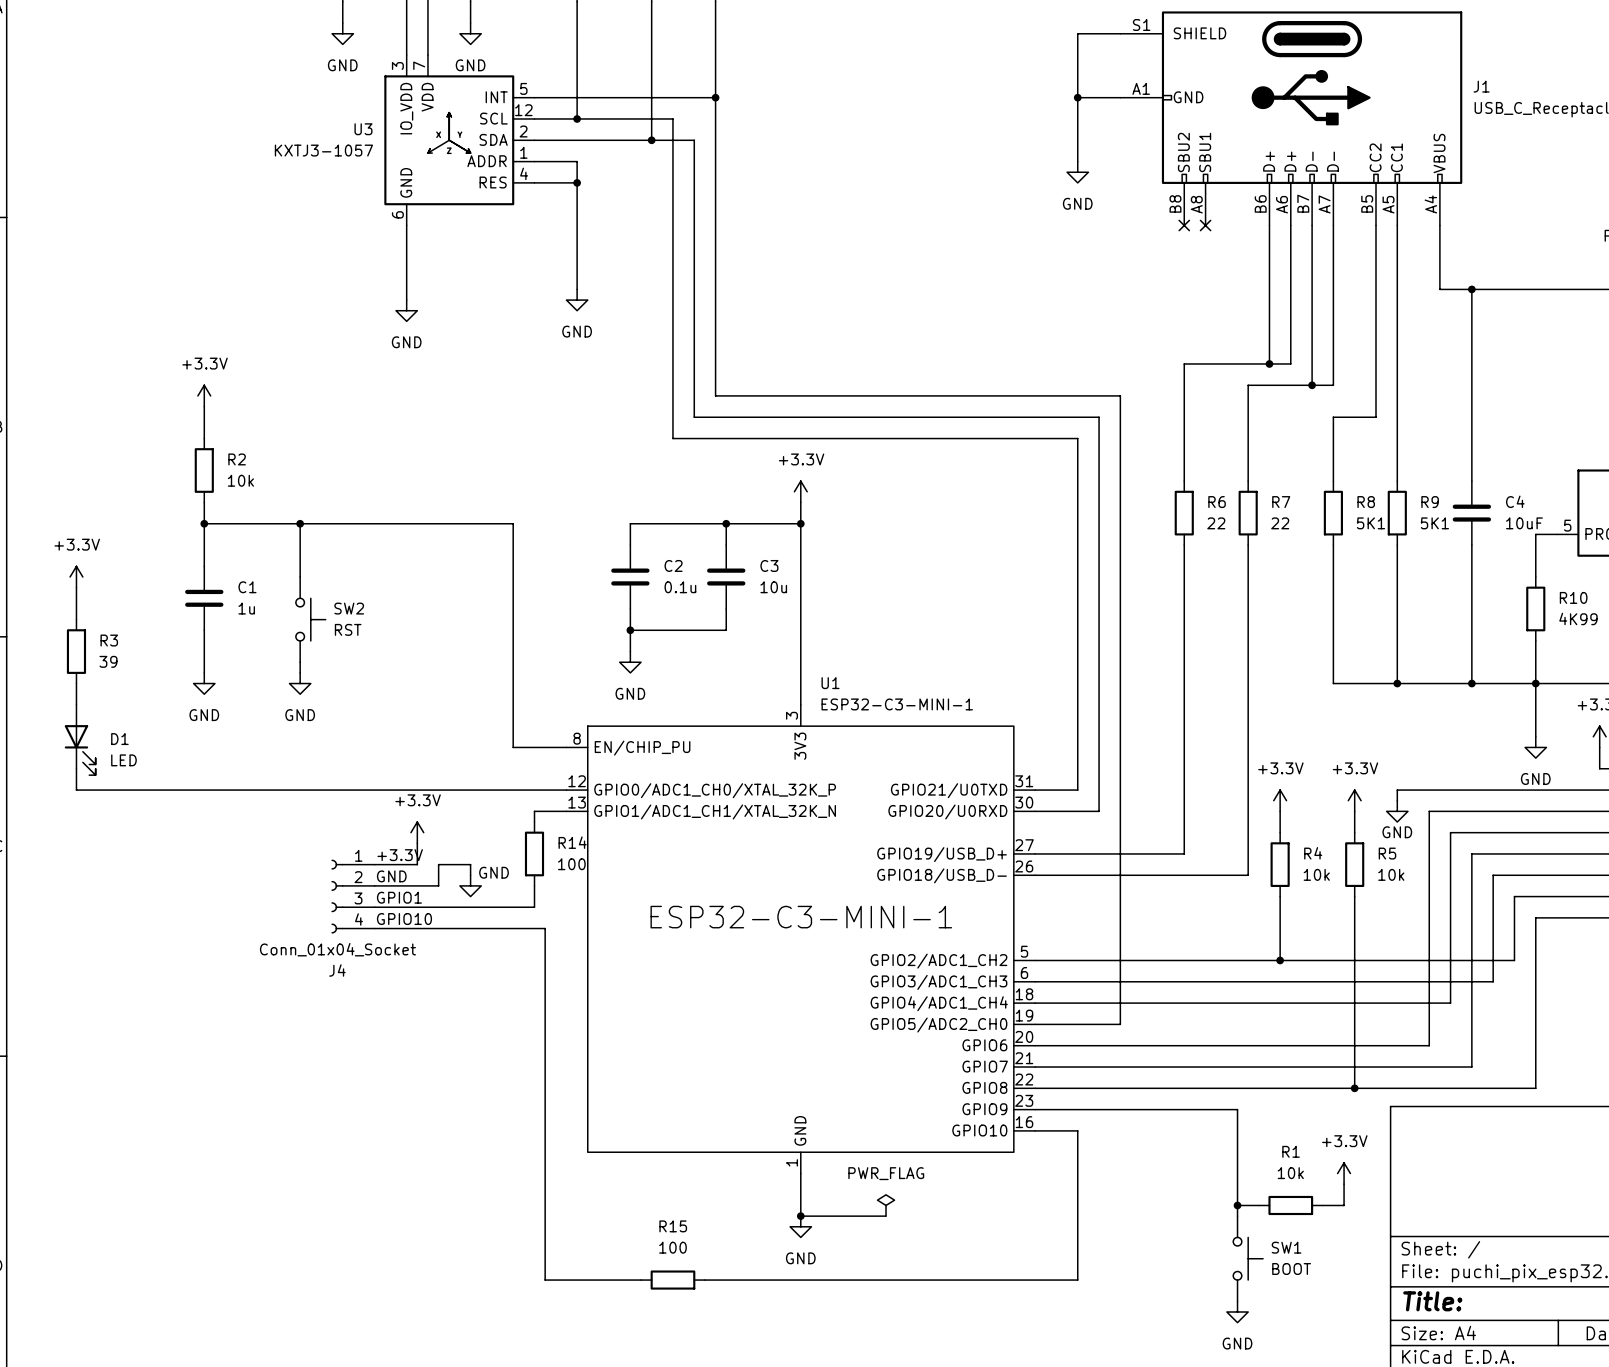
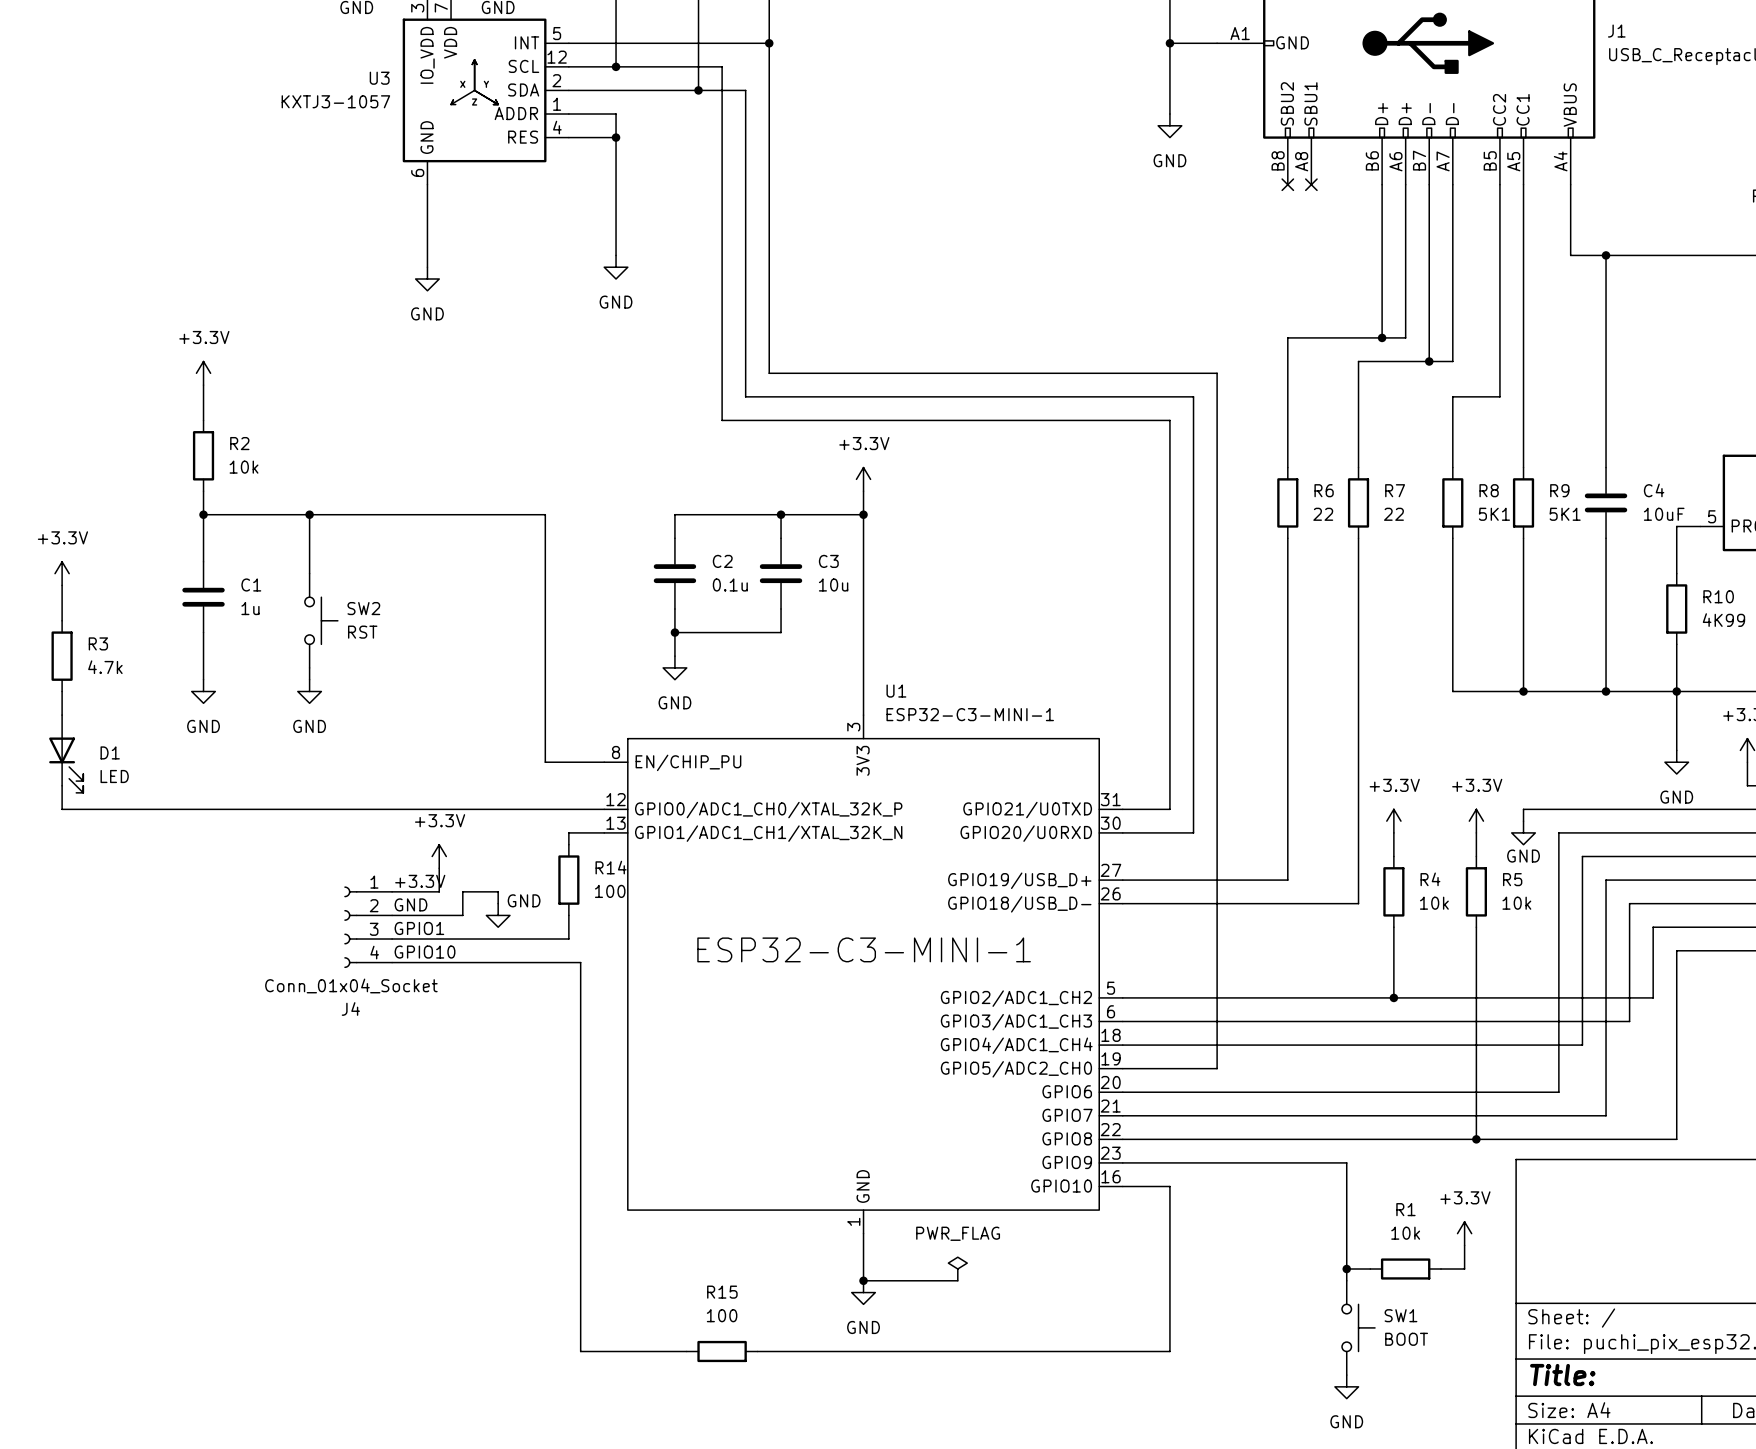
R3 value: 39 (108, 661) -> 4.7k (105, 667)

